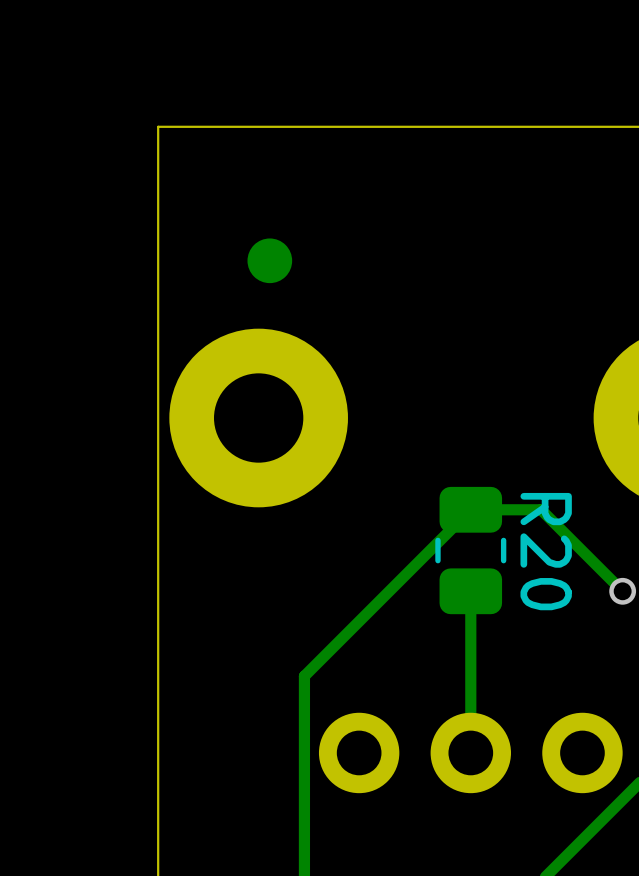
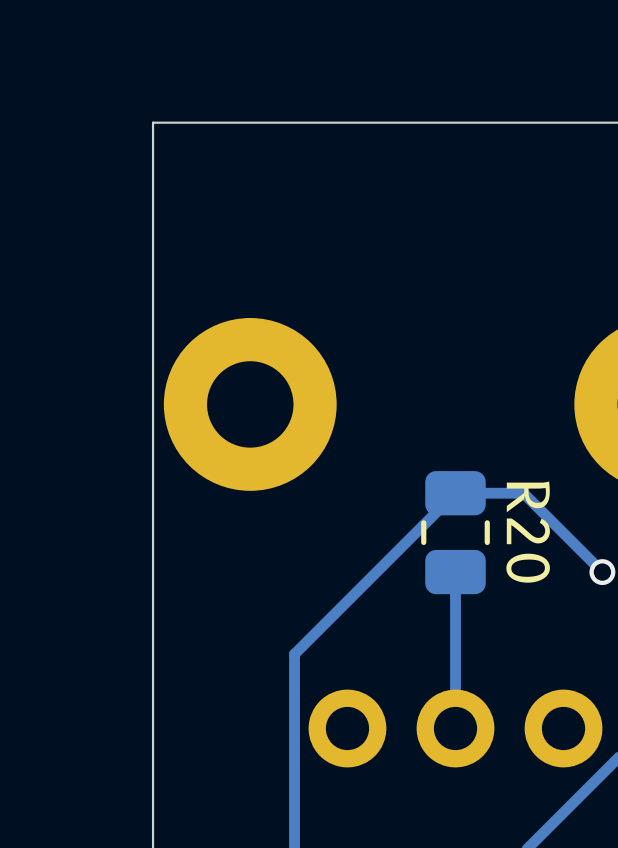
part: (269, 260) -> none

